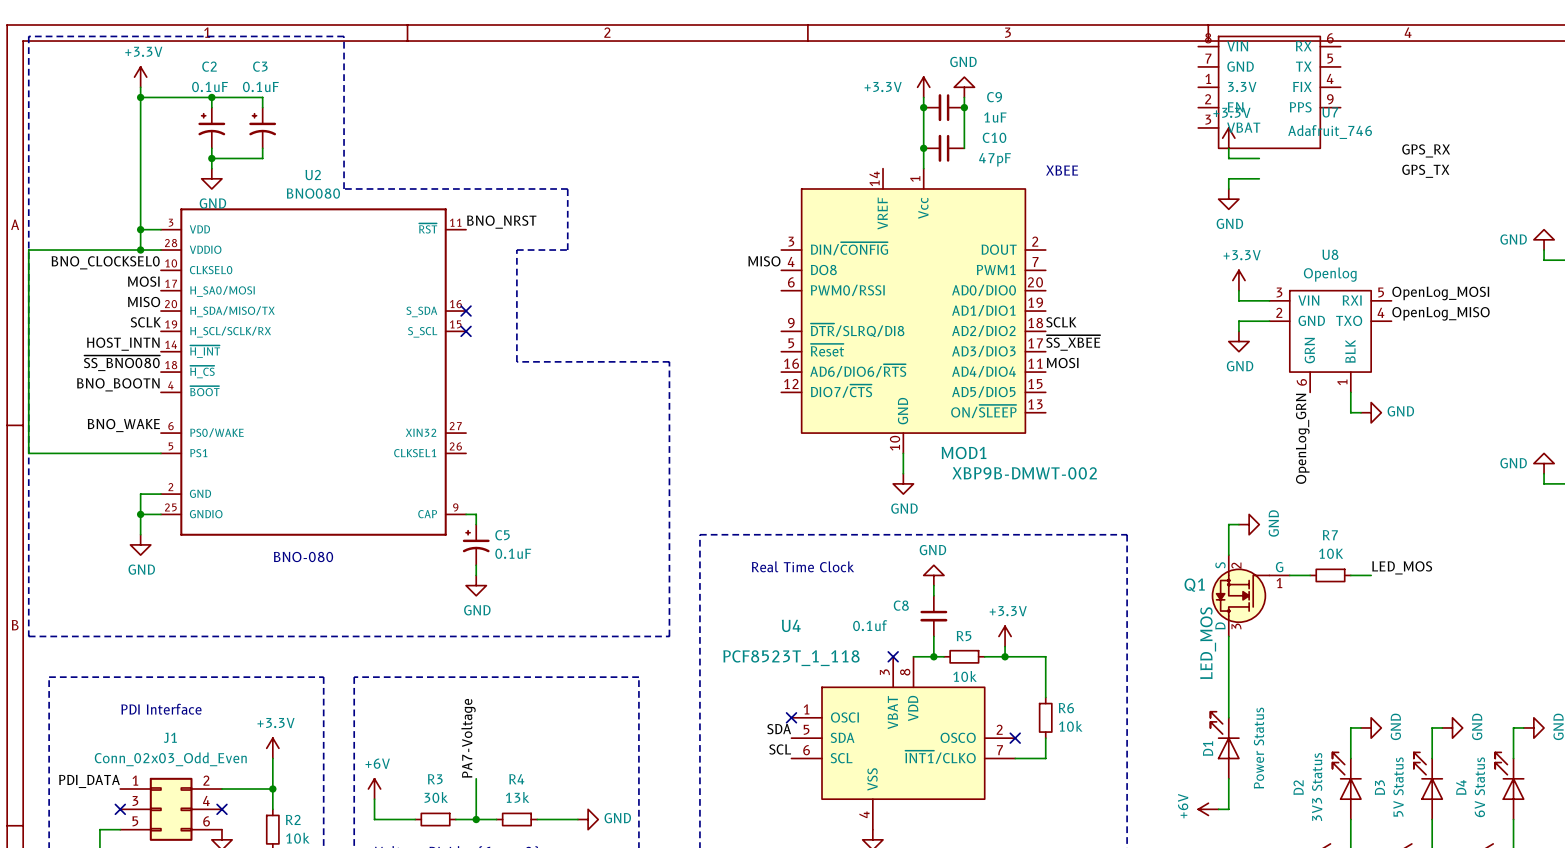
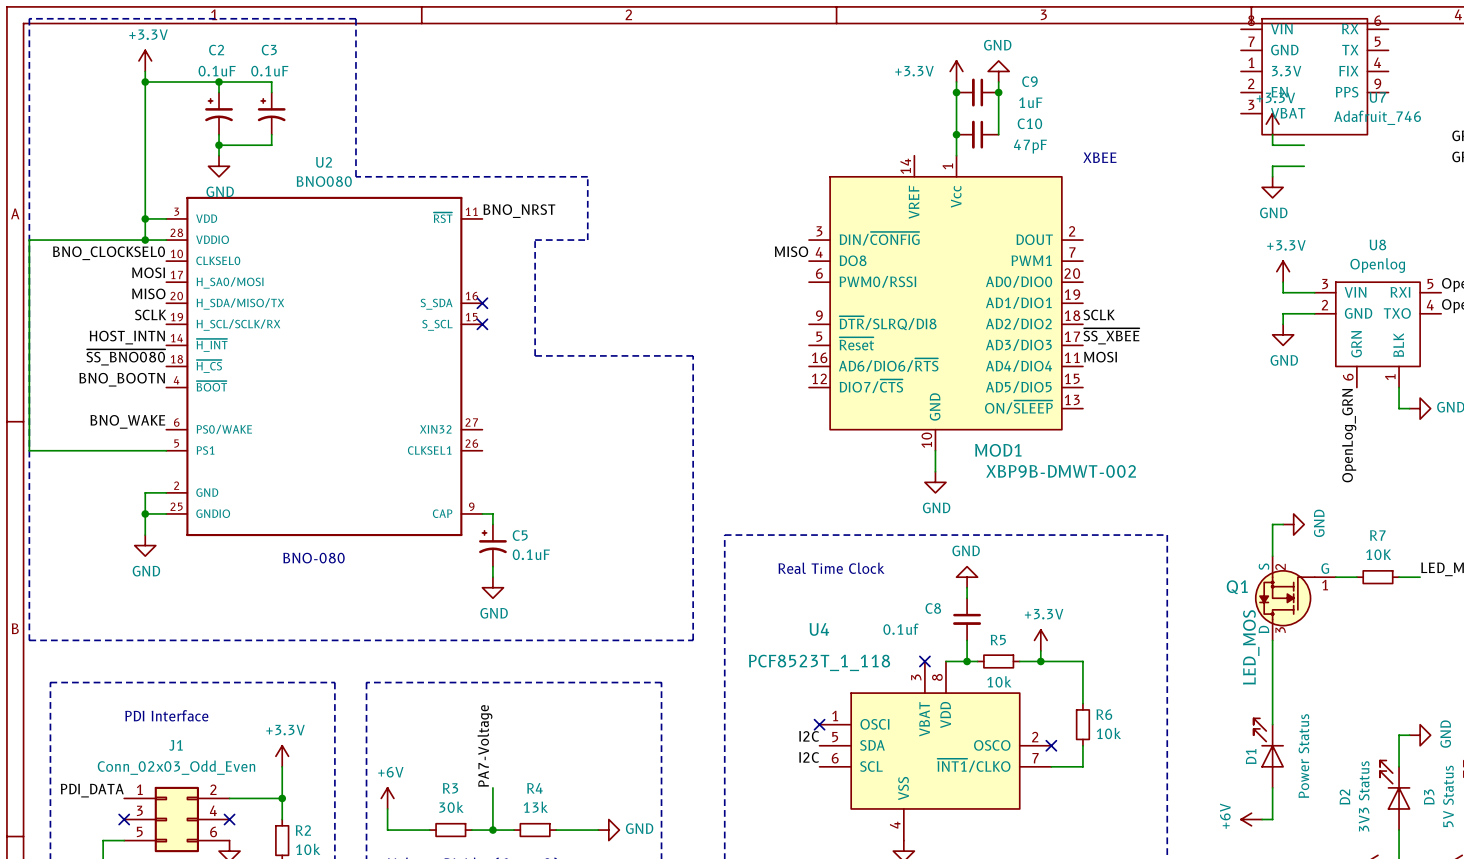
label: SDA (779, 729) -> I2C (809, 736)
label: SCL (780, 749) -> I2C (809, 757)

